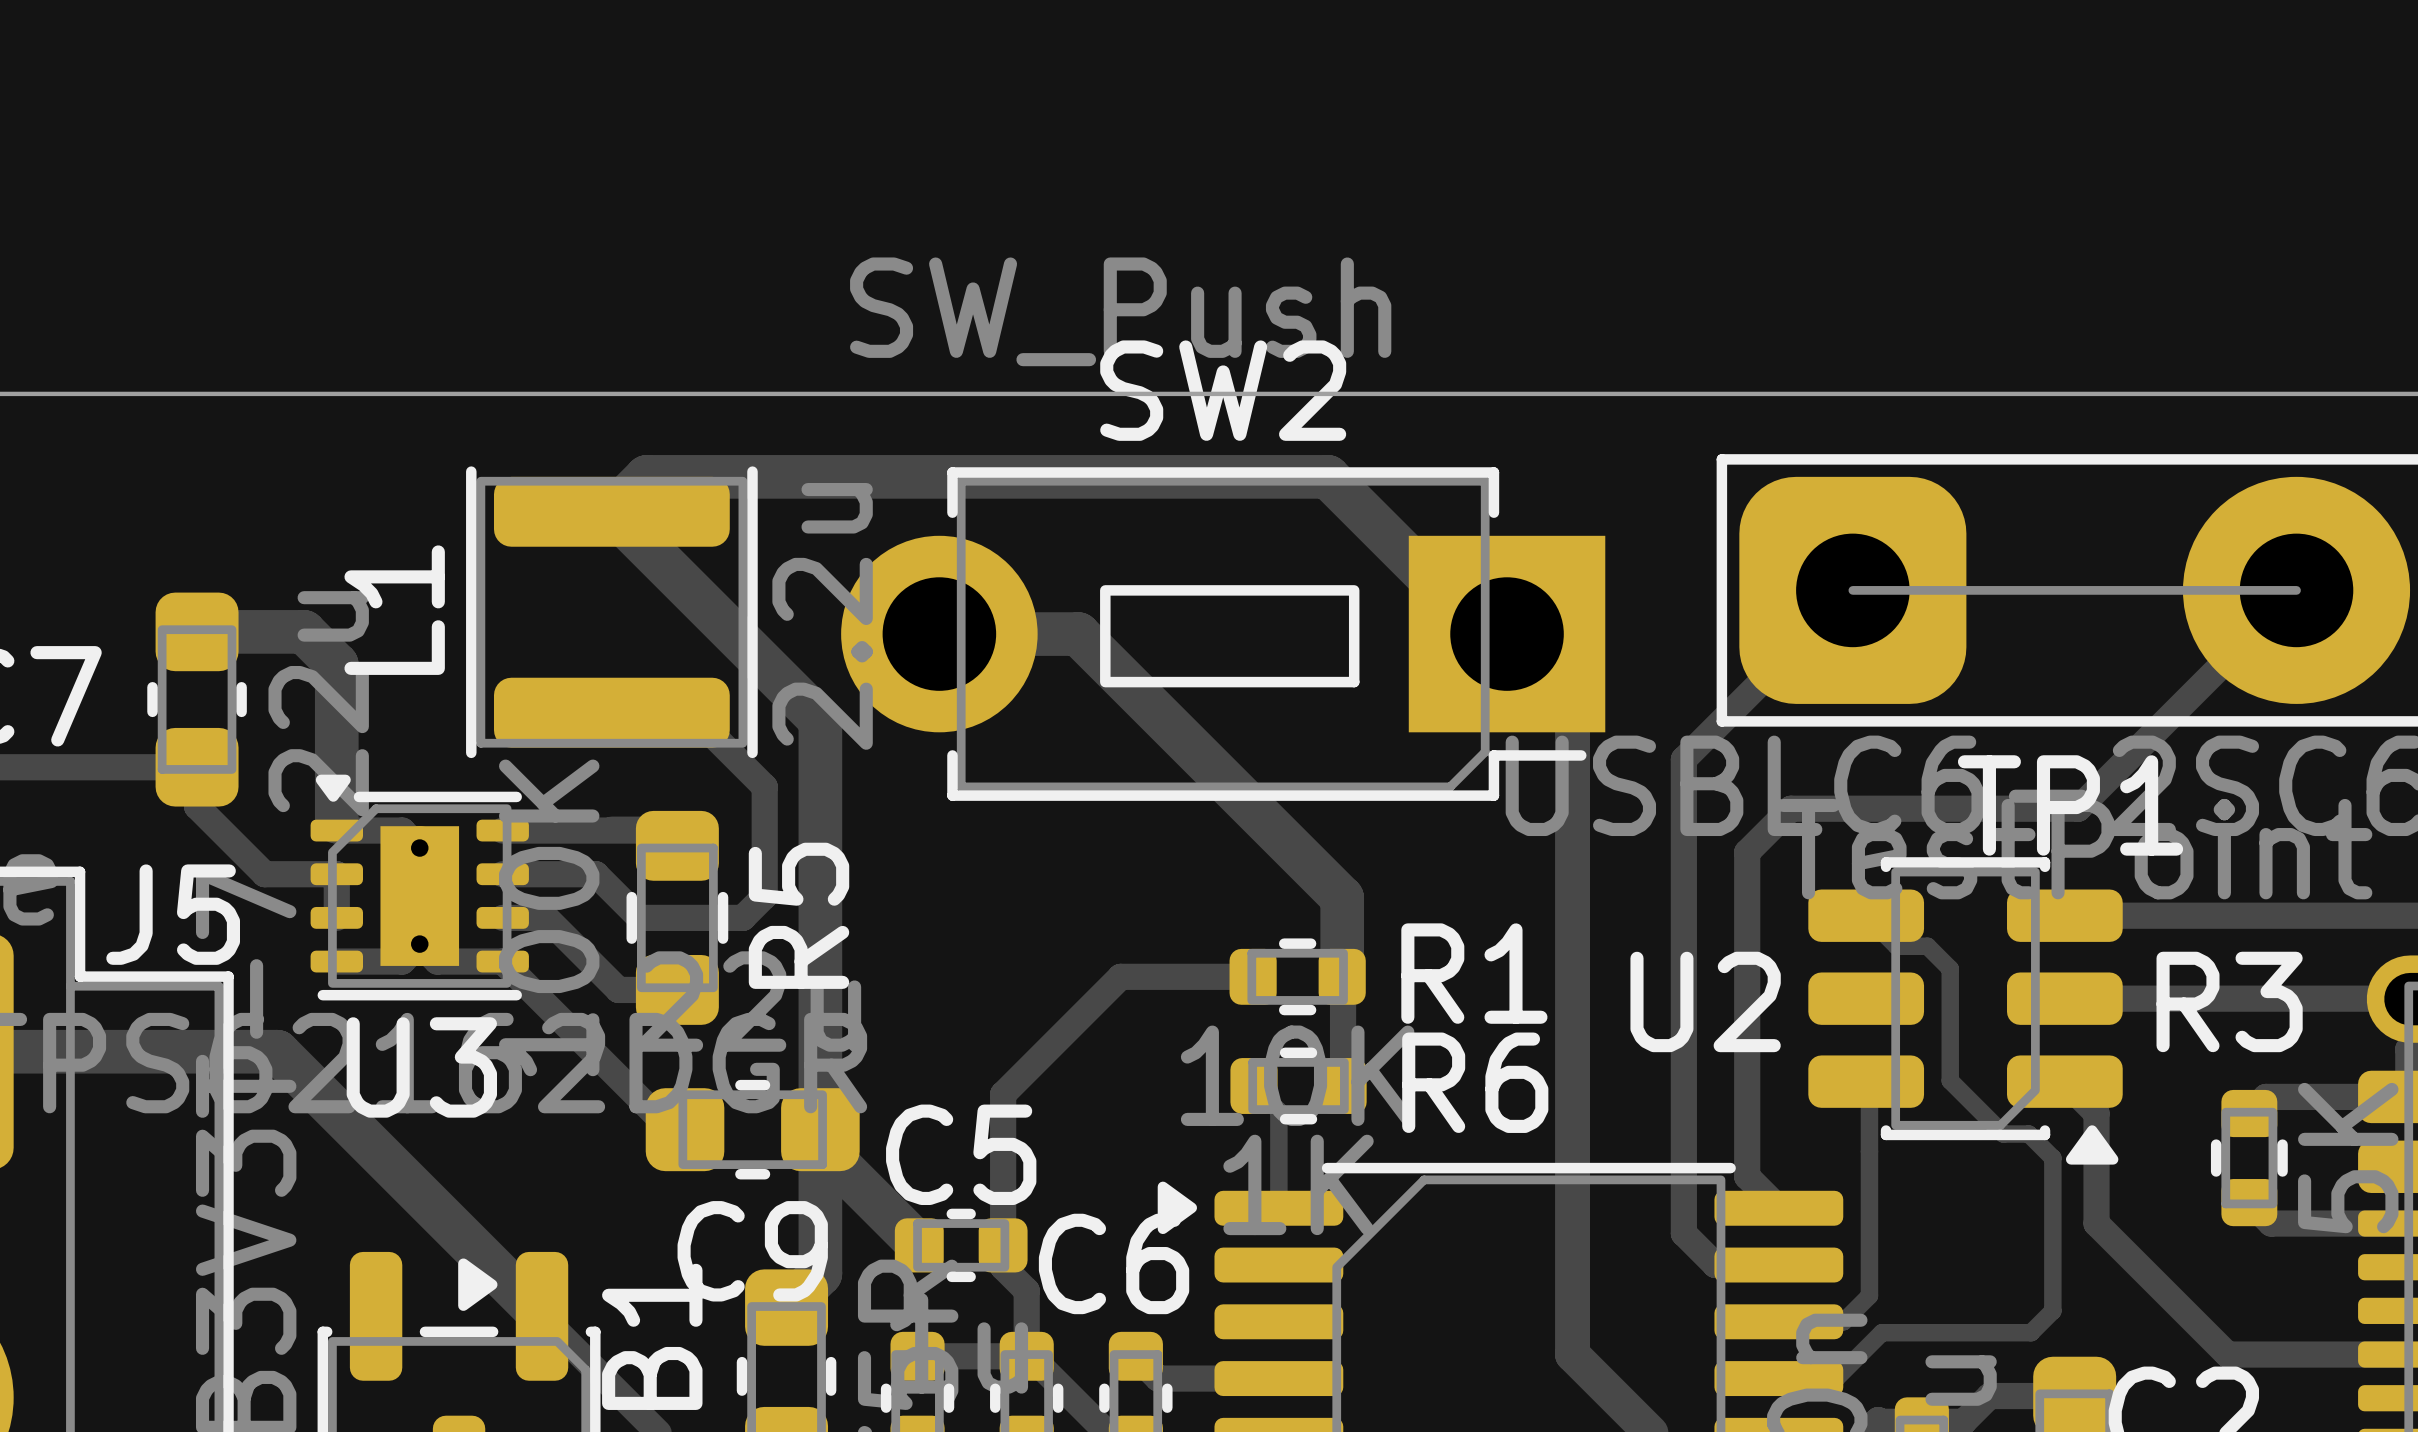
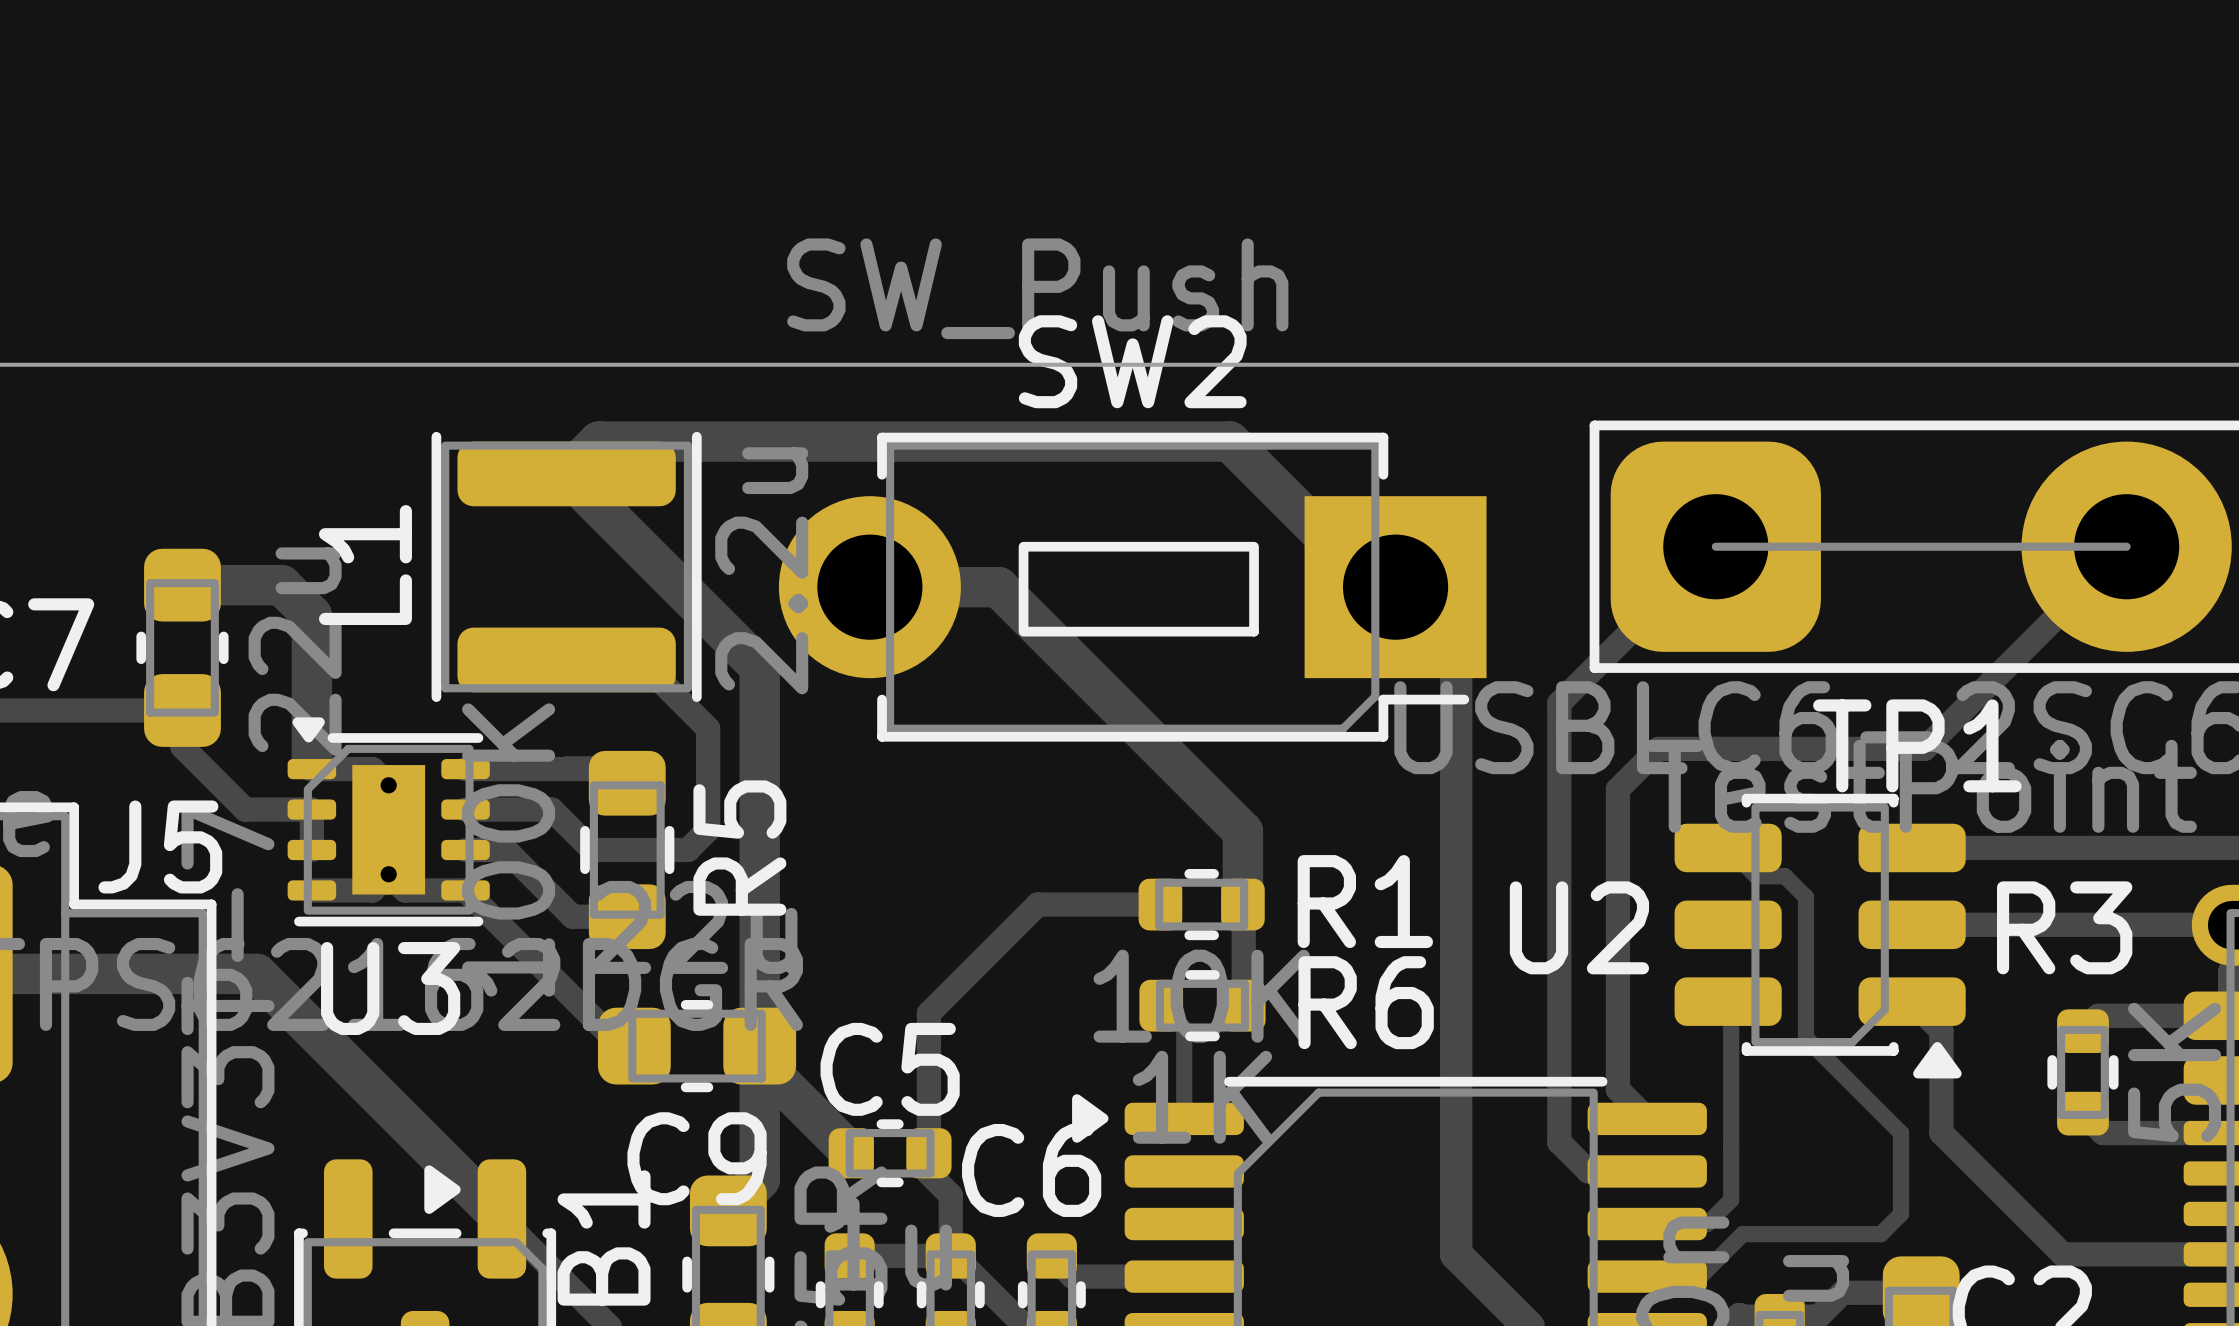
track: (1950, 1080) (2003, 1134) (2028, 1134) (2052, 1158) (2052, 1223) -> (1805, 1000) (1805, 1038) (1901, 1133)

